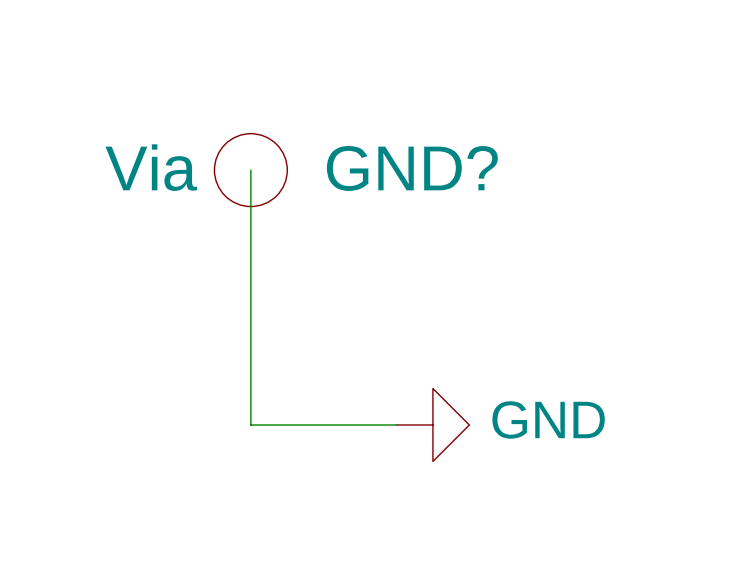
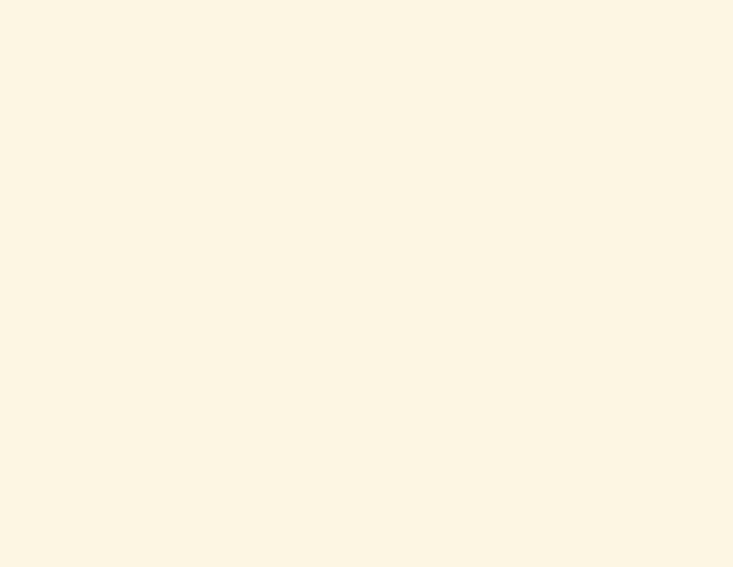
wire: (250, 170) (250, 425) (396, 425) -> none
GND?: Via (250, 170) -> none
power symbol: GND (432, 425) -> none

